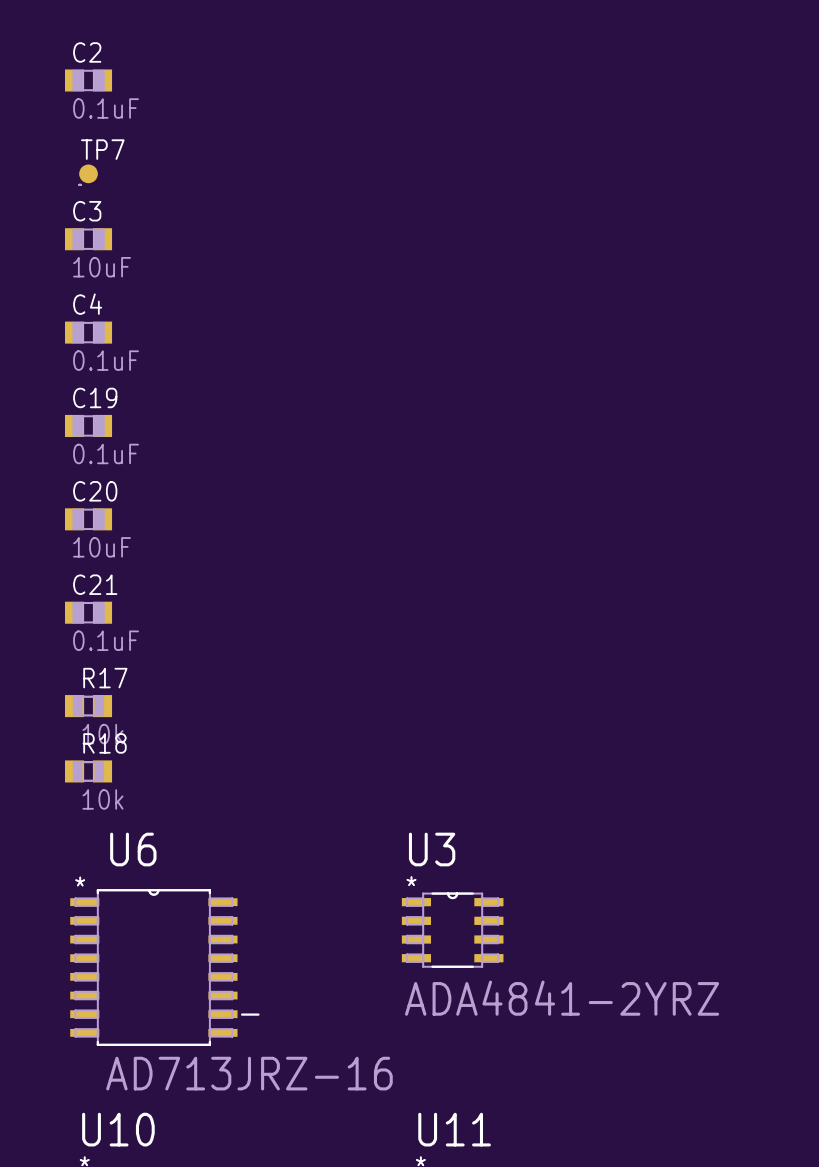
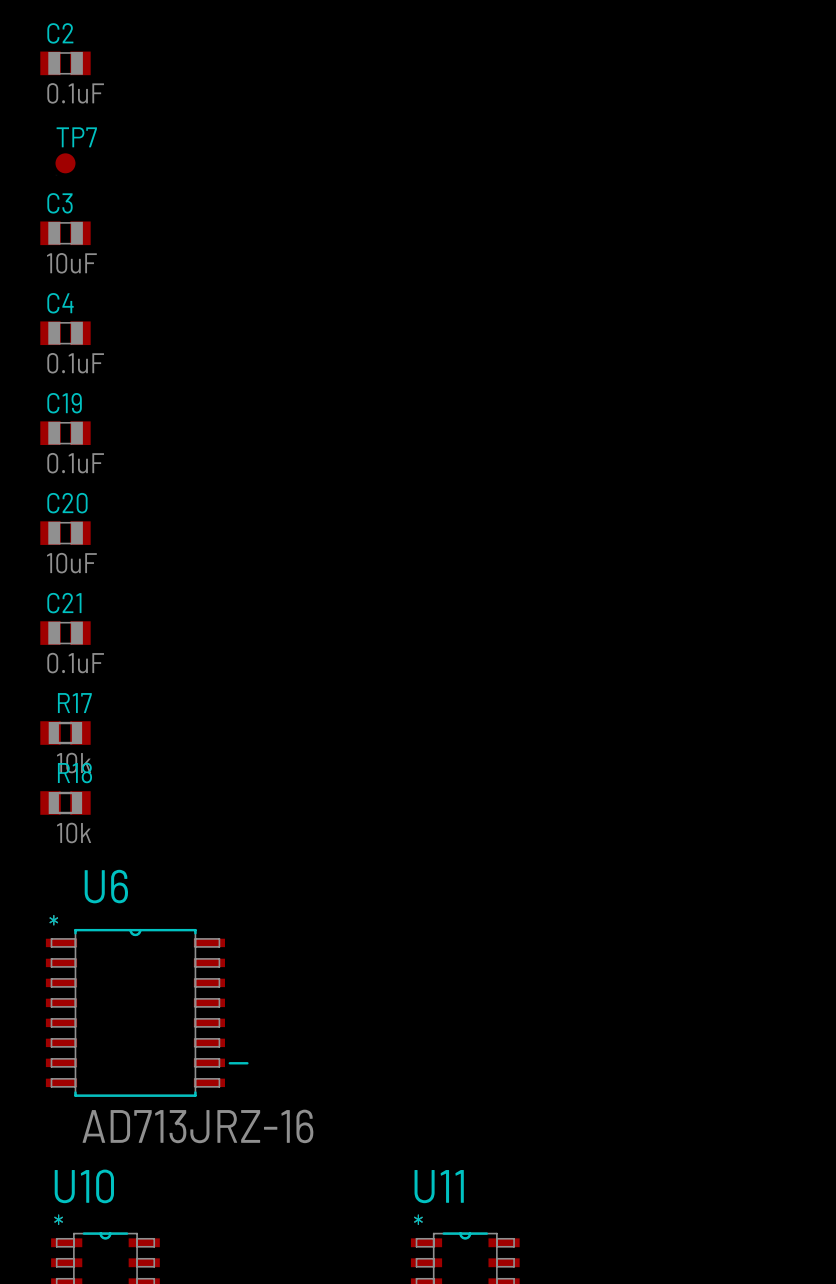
U3: ADA4841-2YRZ (452, 930) -> none

